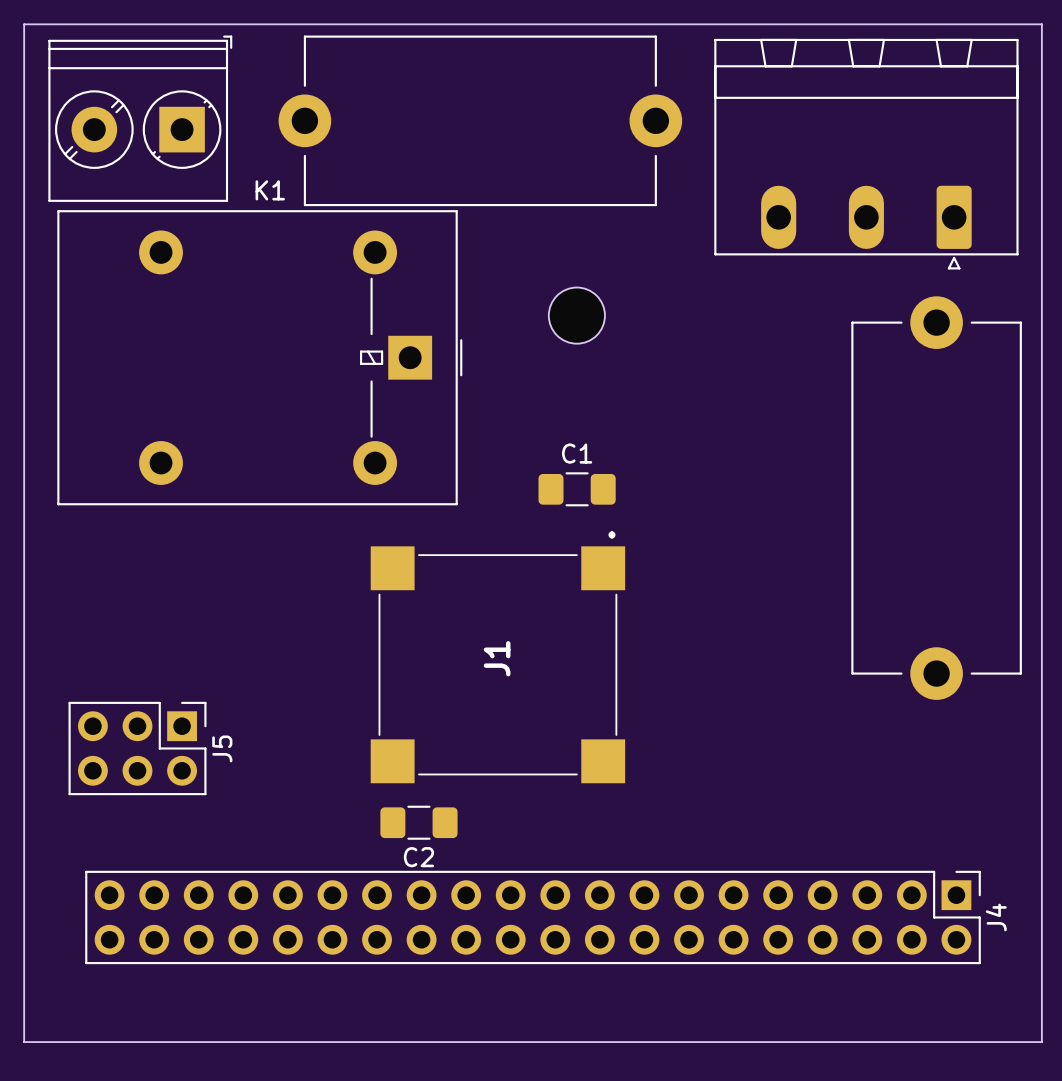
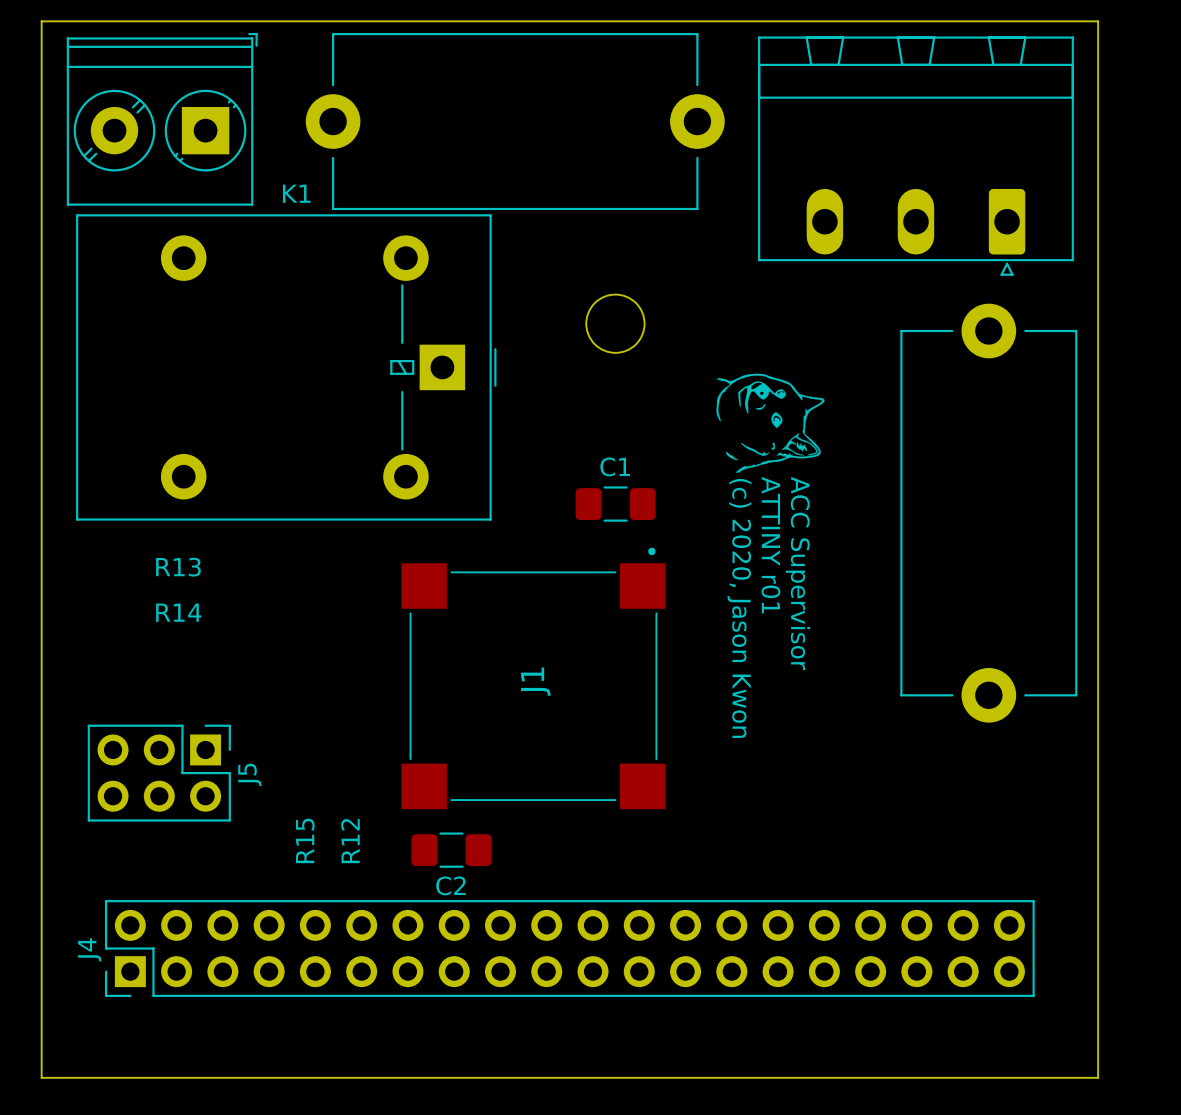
drawing: none -> [716, 373, 825, 473]
text: none -> ATTINY r01 (770, 545)
R13: none -> (178, 567)
text: none -> ACC Supervisor (798, 573)
R14: none -> (178, 612)
text: none -> (c) 2020, Jason Kwon (739, 608)
R15: none -> (305, 840)
R12: none -> (350, 841)
J4 rotation: 0° (533, 917) -> 180° (569, 948)

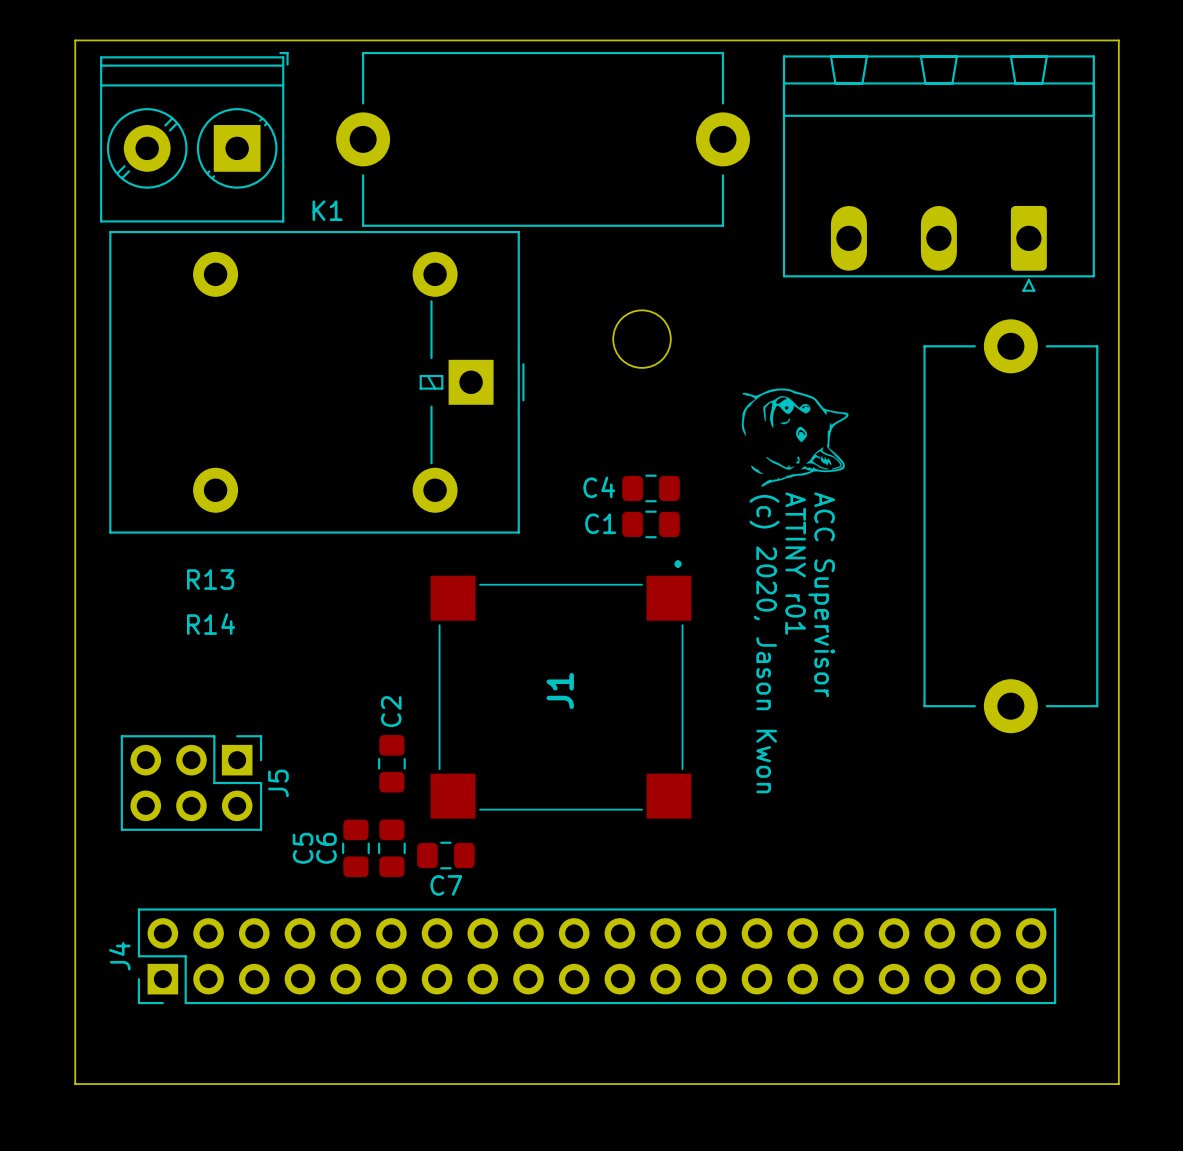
C1 name position: C1 (615, 466) -> C1 (600, 523)
C4: none -> (651, 488)
C1 footprint: [575, 486, 656, 522] -> [622, 510, 680, 539]
C2 footprint: [411, 832, 492, 868] -> [378, 734, 406, 793]
C5: none -> (355, 848)
C6: none -> (391, 848)
R15: (305, 840) -> none
R12: (350, 841) -> none
C7: none -> (445, 855)
C2 name position: C2 (450, 885) -> C2 (391, 711)

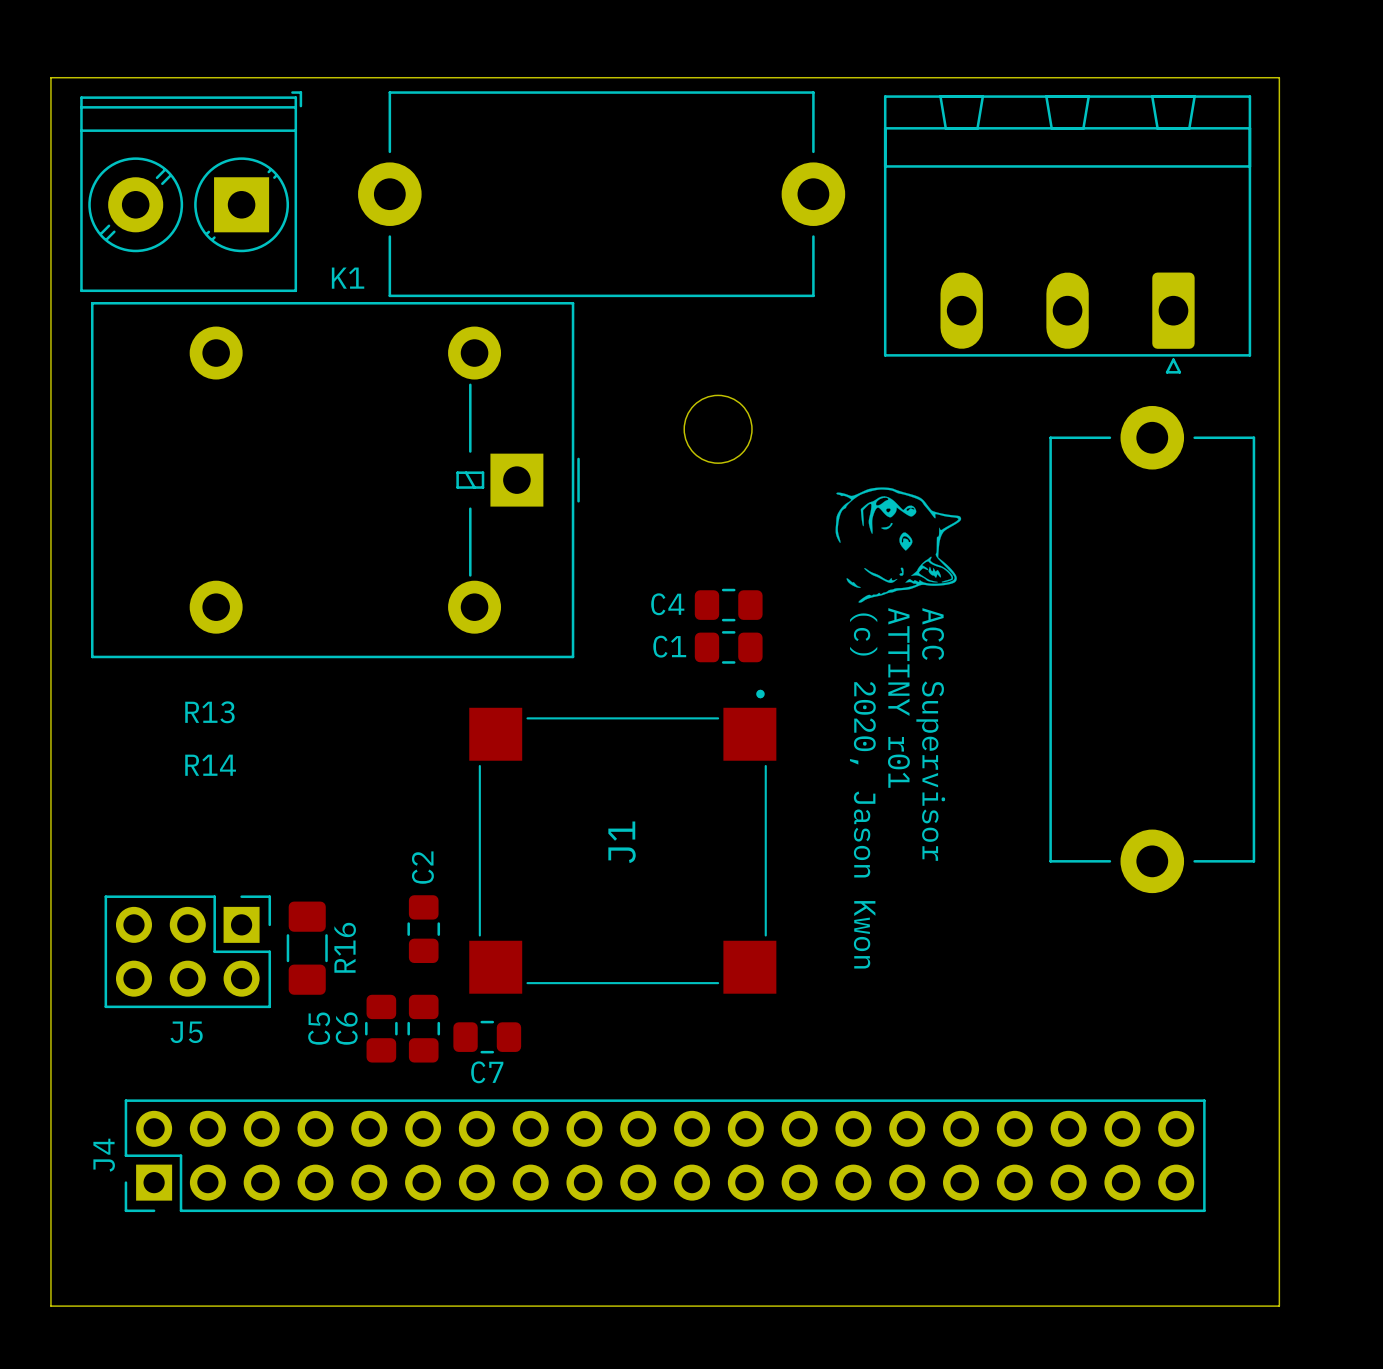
R16: none -> (307, 948)
J5 name rotation: 0° (278, 783) -> 90° clockwise (186, 1032)
J5 name position: J5 (278, 783) -> J5 (186, 1032)

